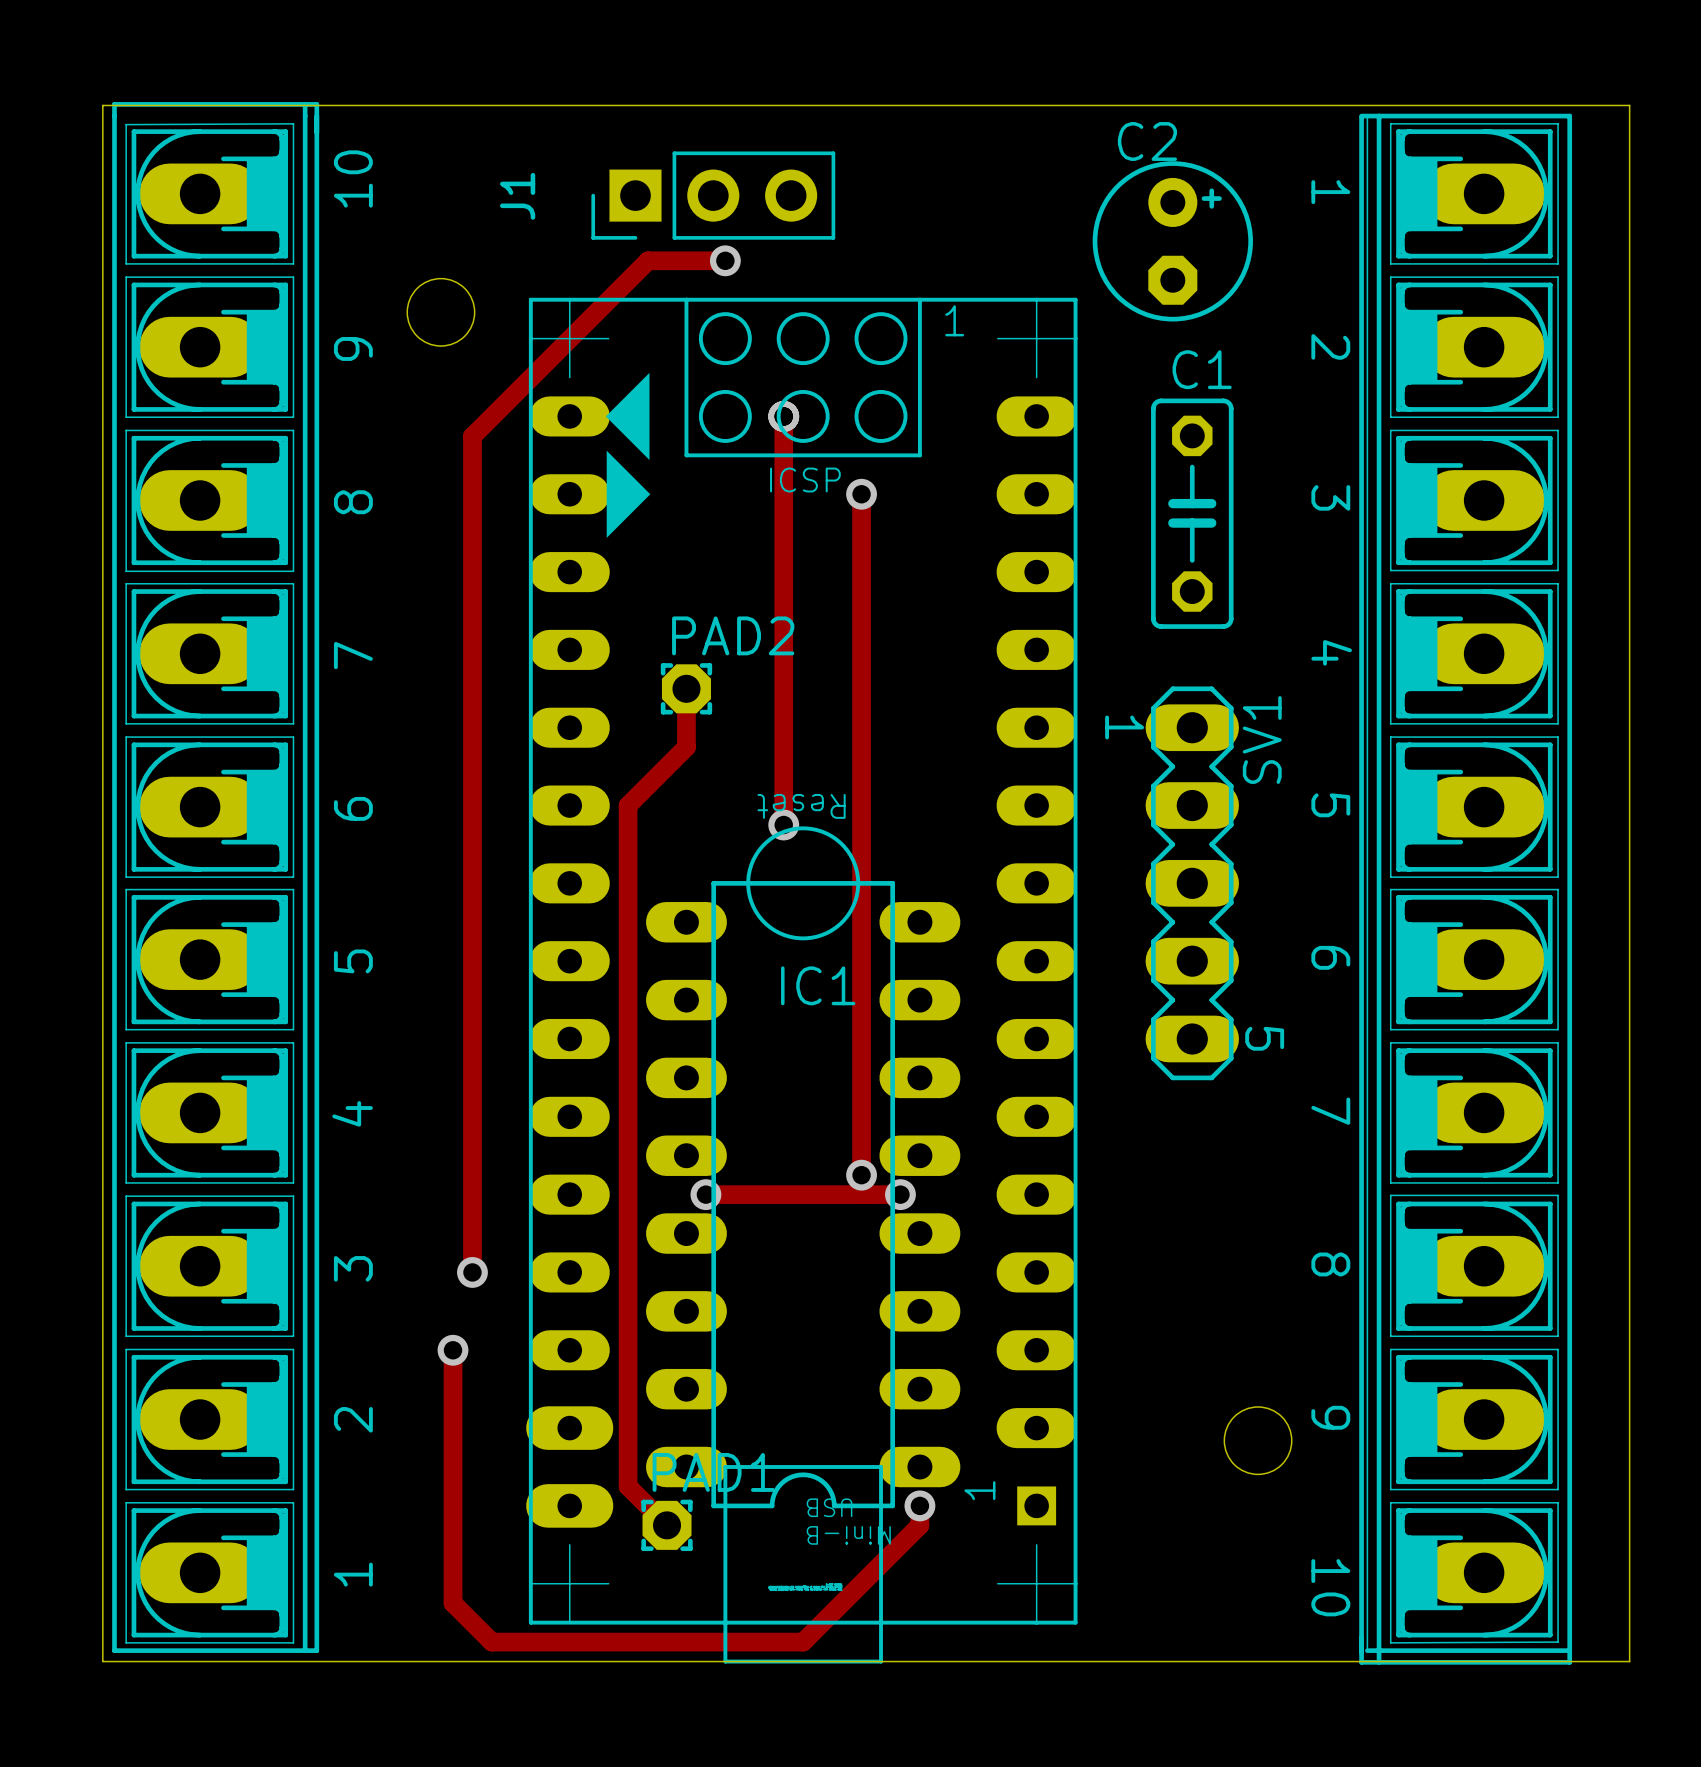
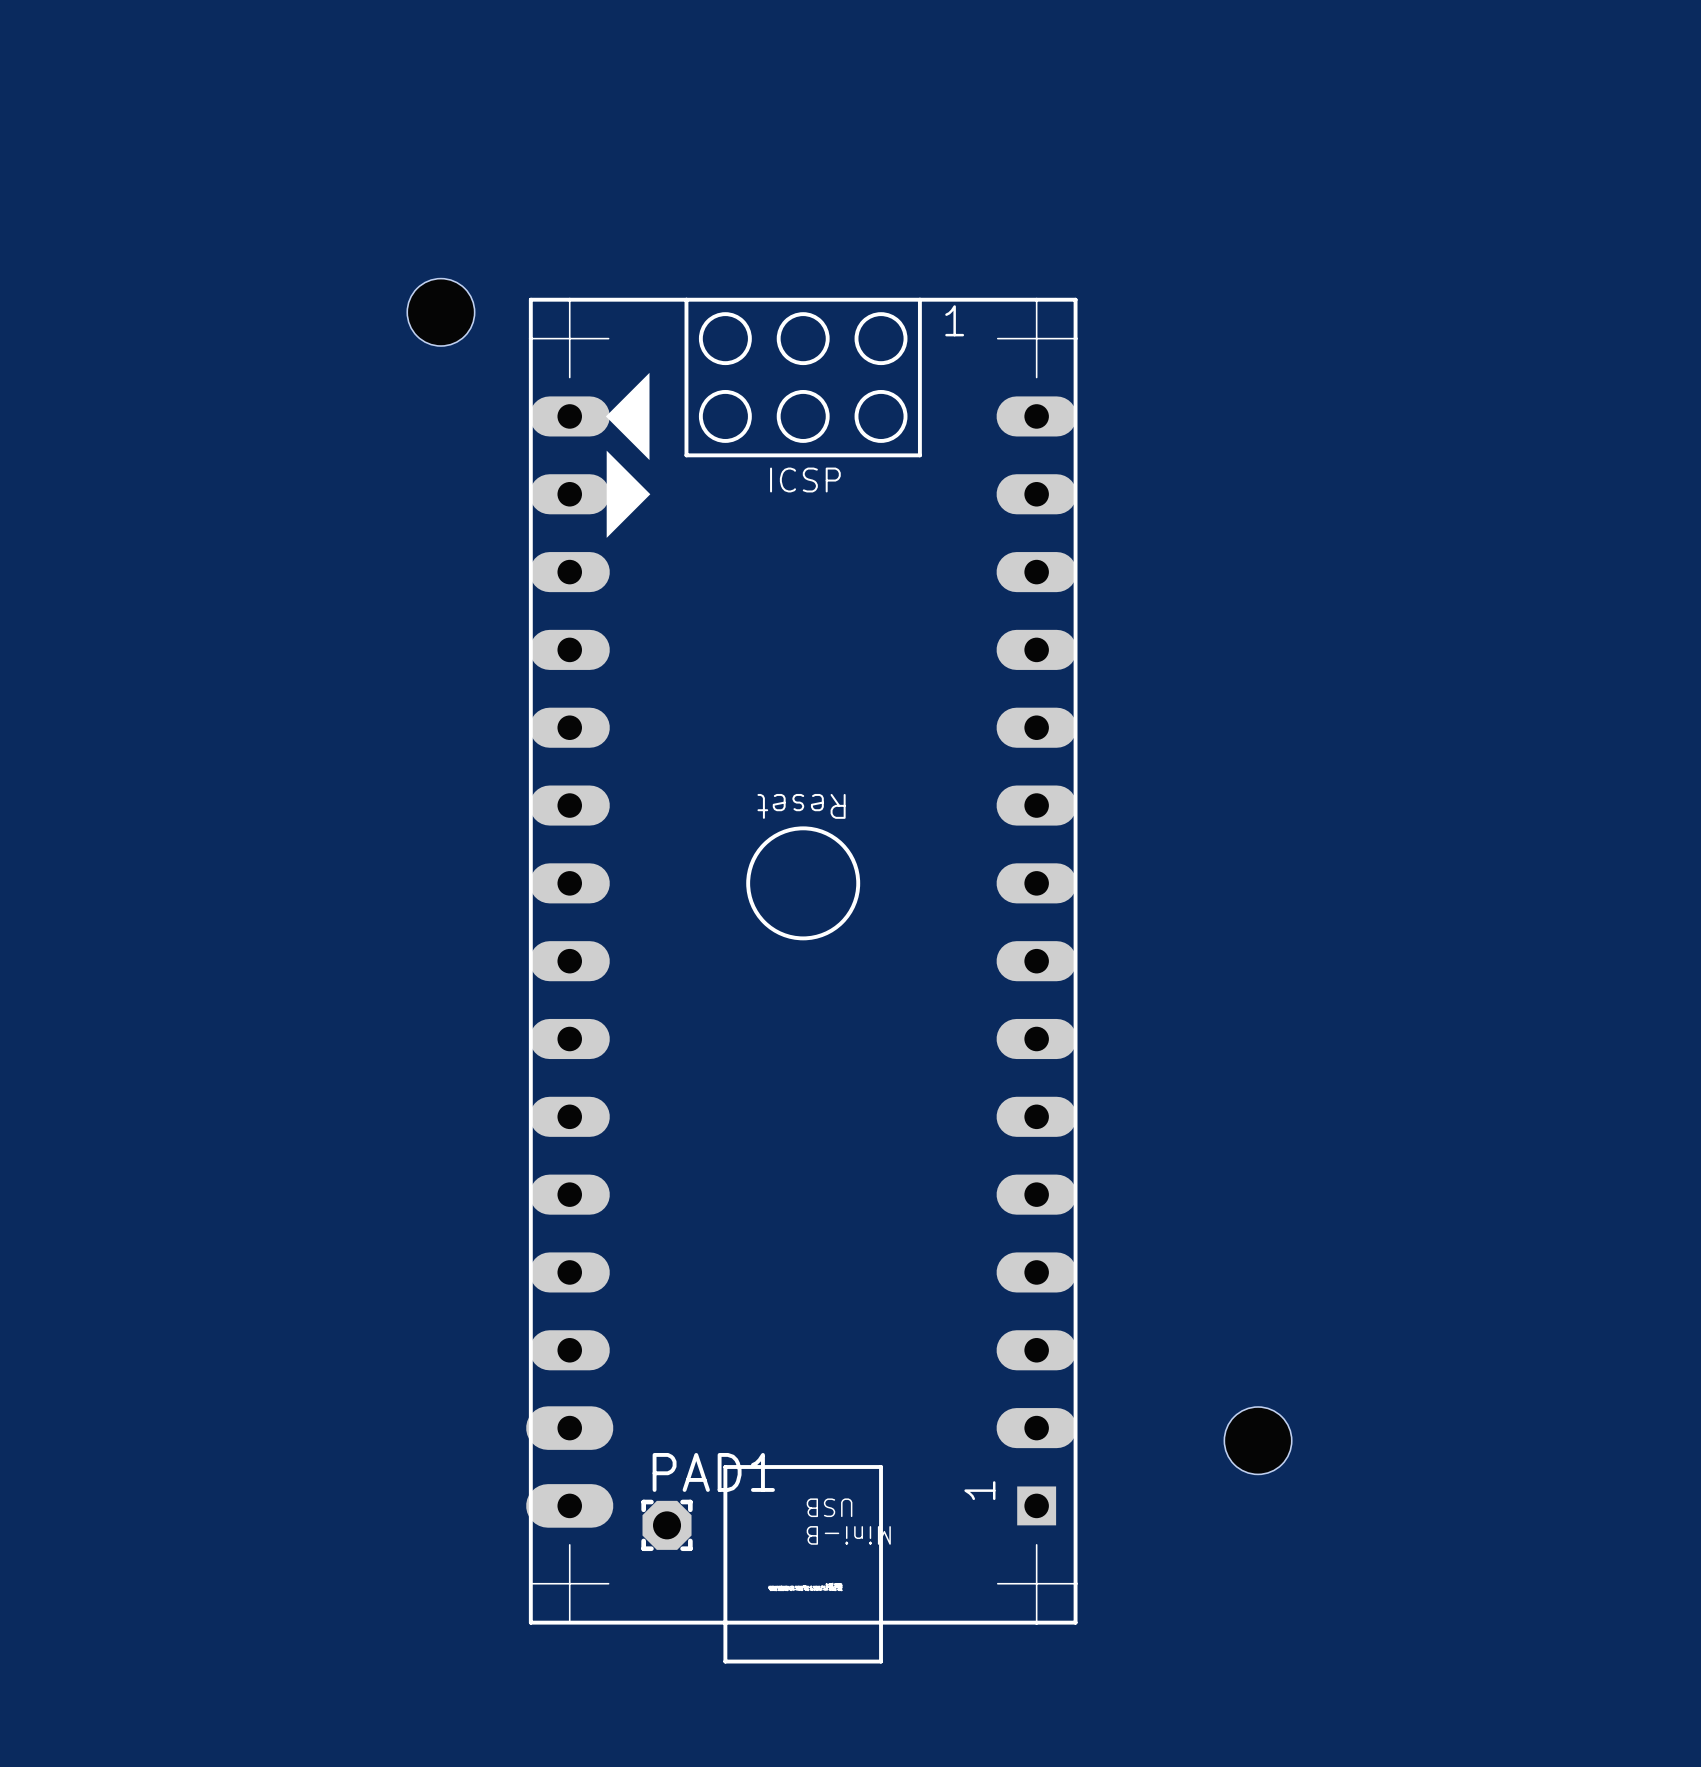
board edge: (102, 105) (1629, 105) (1629, 1661) (102, 1661) (102, 105) -> none
J1: (713, 195) -> none
C2: (1172, 241) -> none
track: (725, 260) (648, 260) (472, 436) (472, 1272) -> none
via: (725, 260) -> none
track: (783, 416) (783, 824) -> none
via: (783, 416) -> none
track: (861, 494) (861, 1194) -> none
via: (861, 494) -> none
C1: (1192, 513) -> none
track: (686, 688) (686, 747) (628, 805) (628, 1486) (667, 1525) -> none
PAD2: (686, 688) -> none
via: (783, 824) -> none
part: (215, 877) -> none
SV1: (1192, 883) -> none
part: (1465, 889) -> none
via: (861, 1175) -> none
track: (705, 1194) (900, 1194) -> none
via: (705, 1194) -> none
IC1: (803, 1194) -> none
via: (900, 1194) -> none
via: (472, 1272) -> none
track: (453, 1350) (453, 1603) (491, 1642) (803, 1642) (919, 1525) (919, 1505) -> none
via: (453, 1350) -> none
via: (919, 1505) -> none

